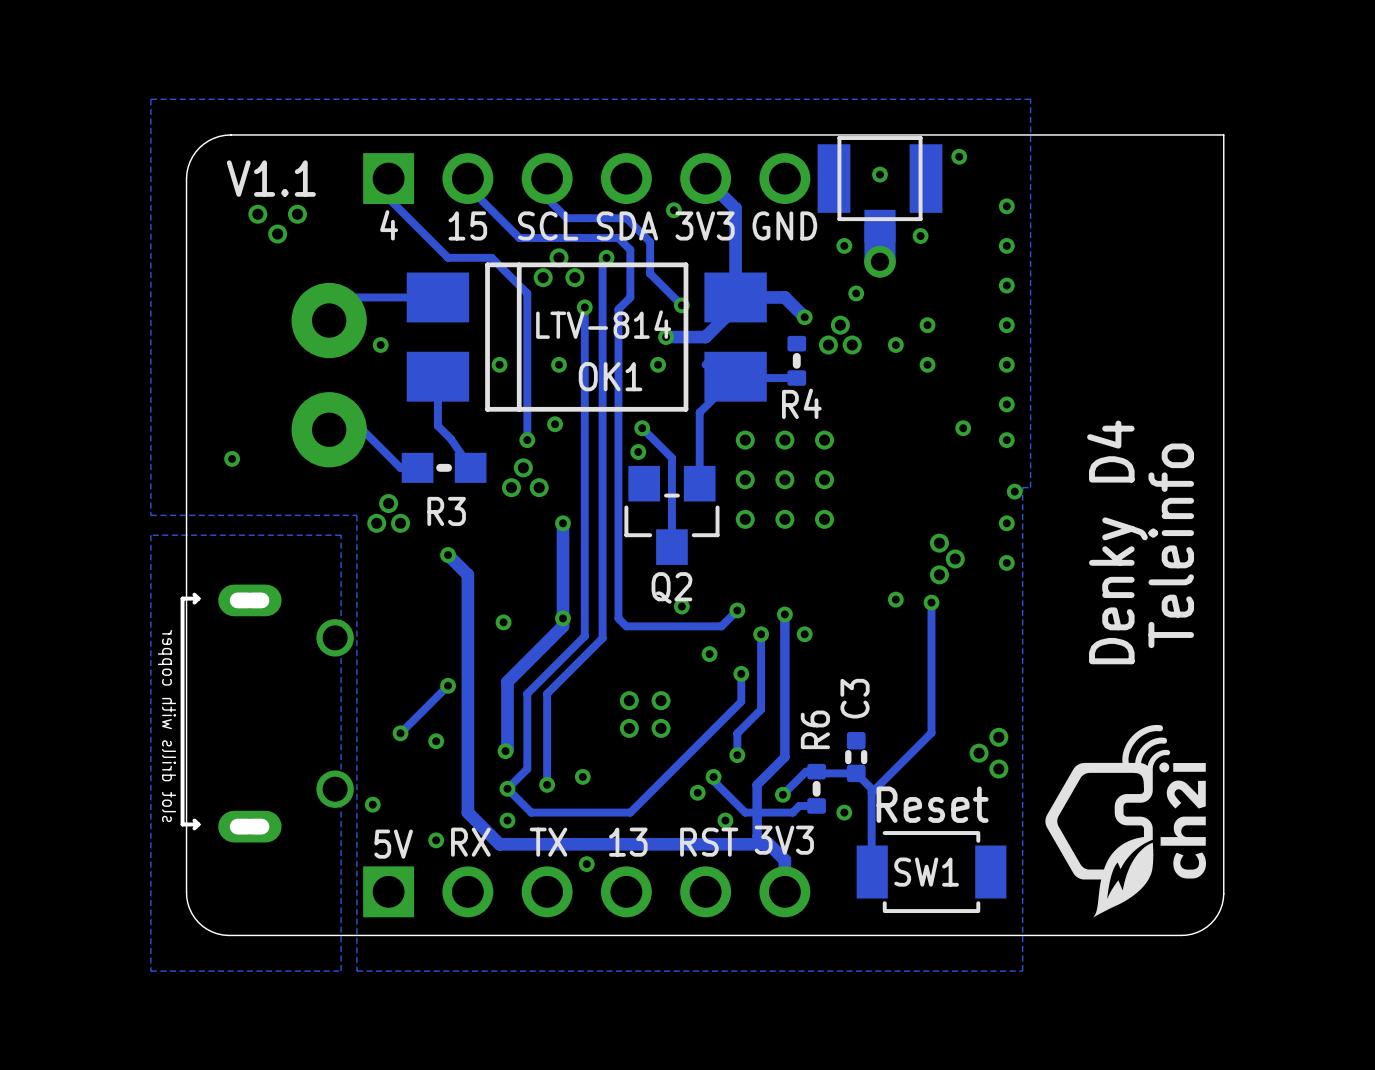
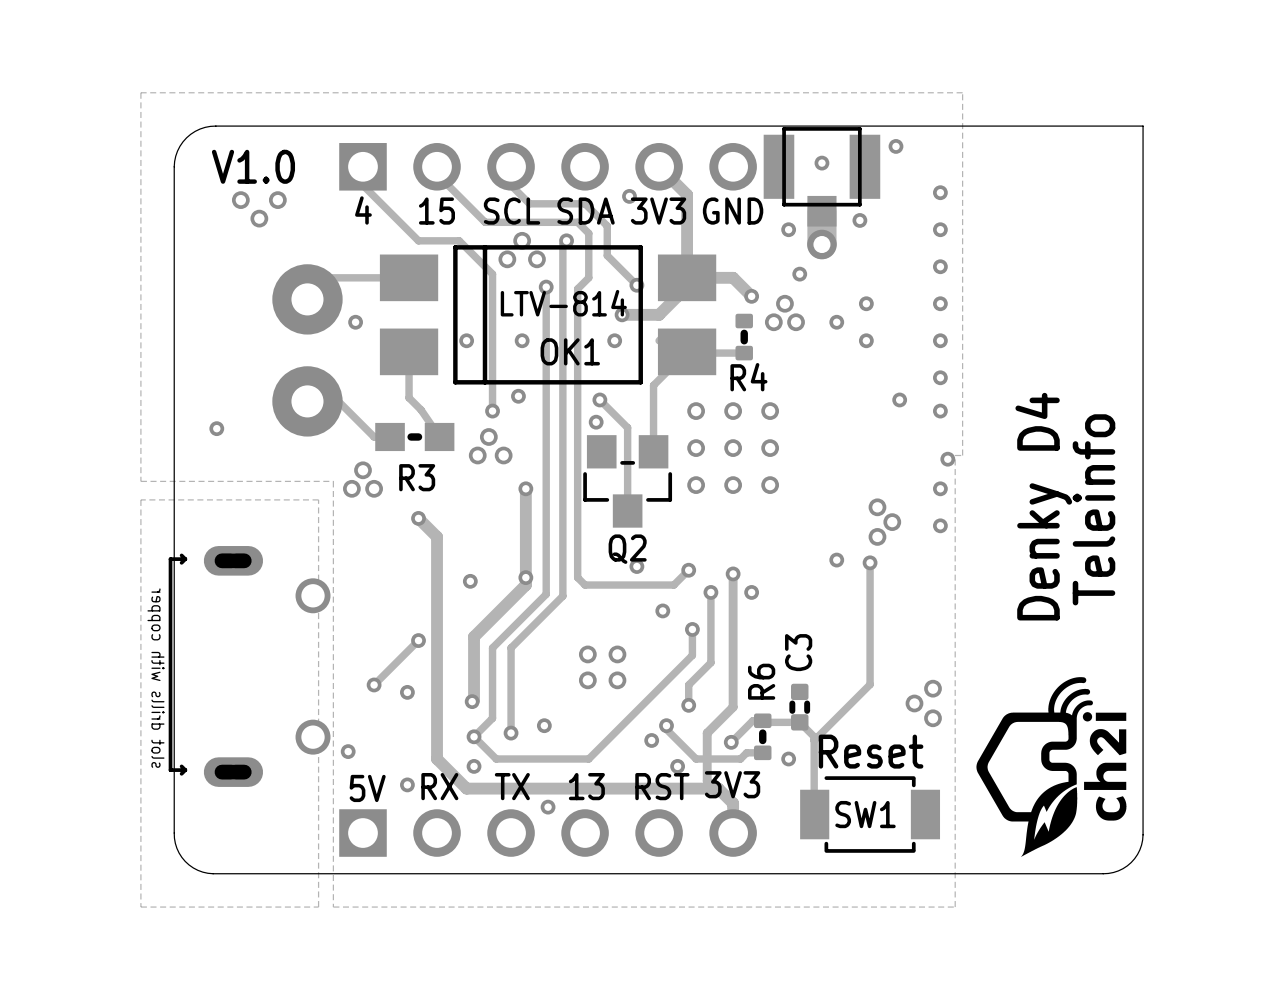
text: V1.1 (271, 178) -> V1.0 (253, 166)

